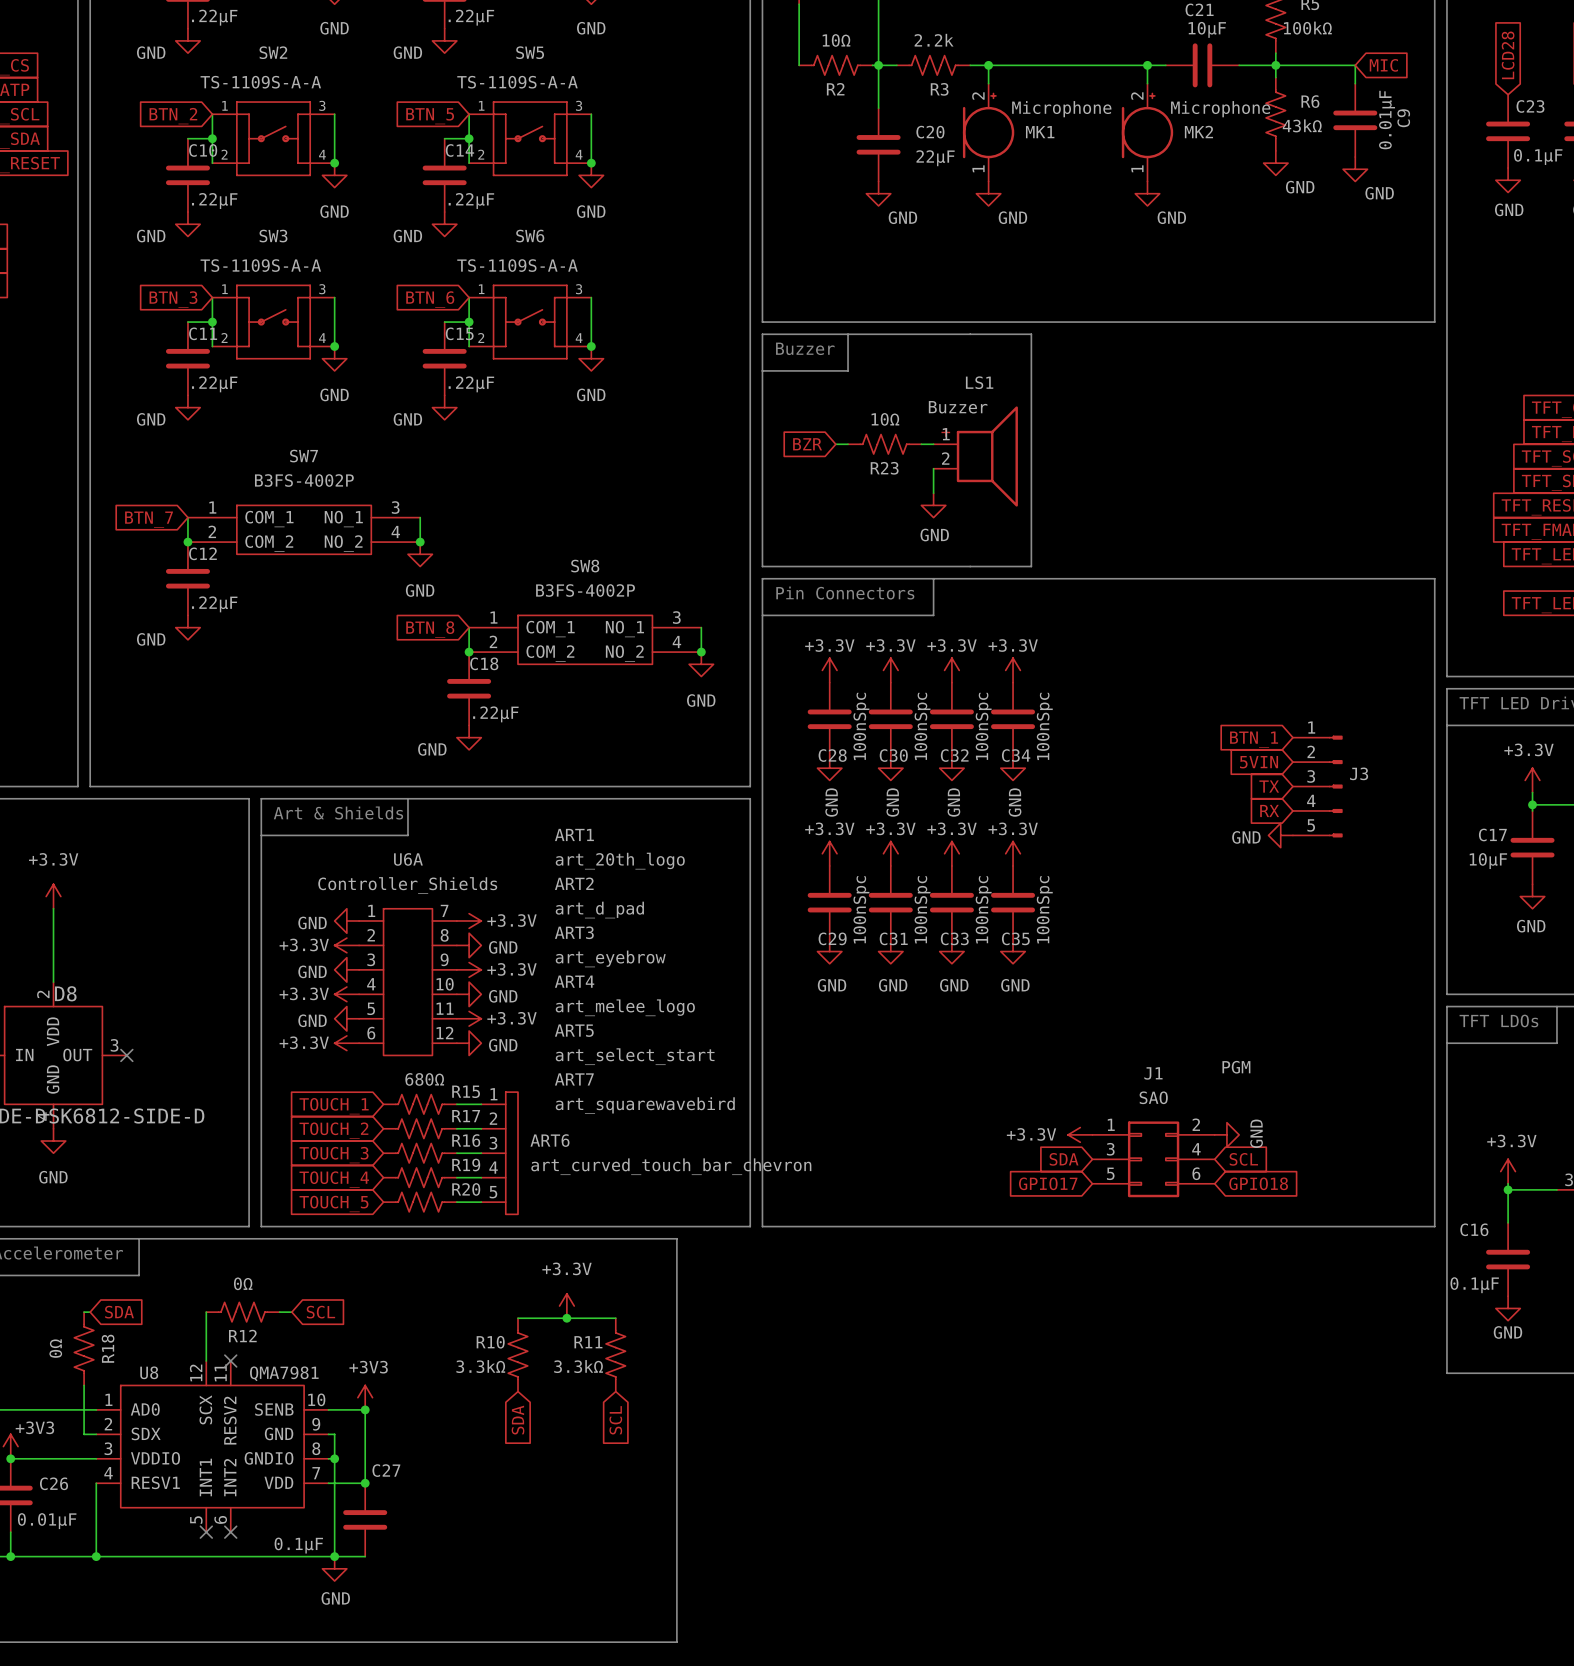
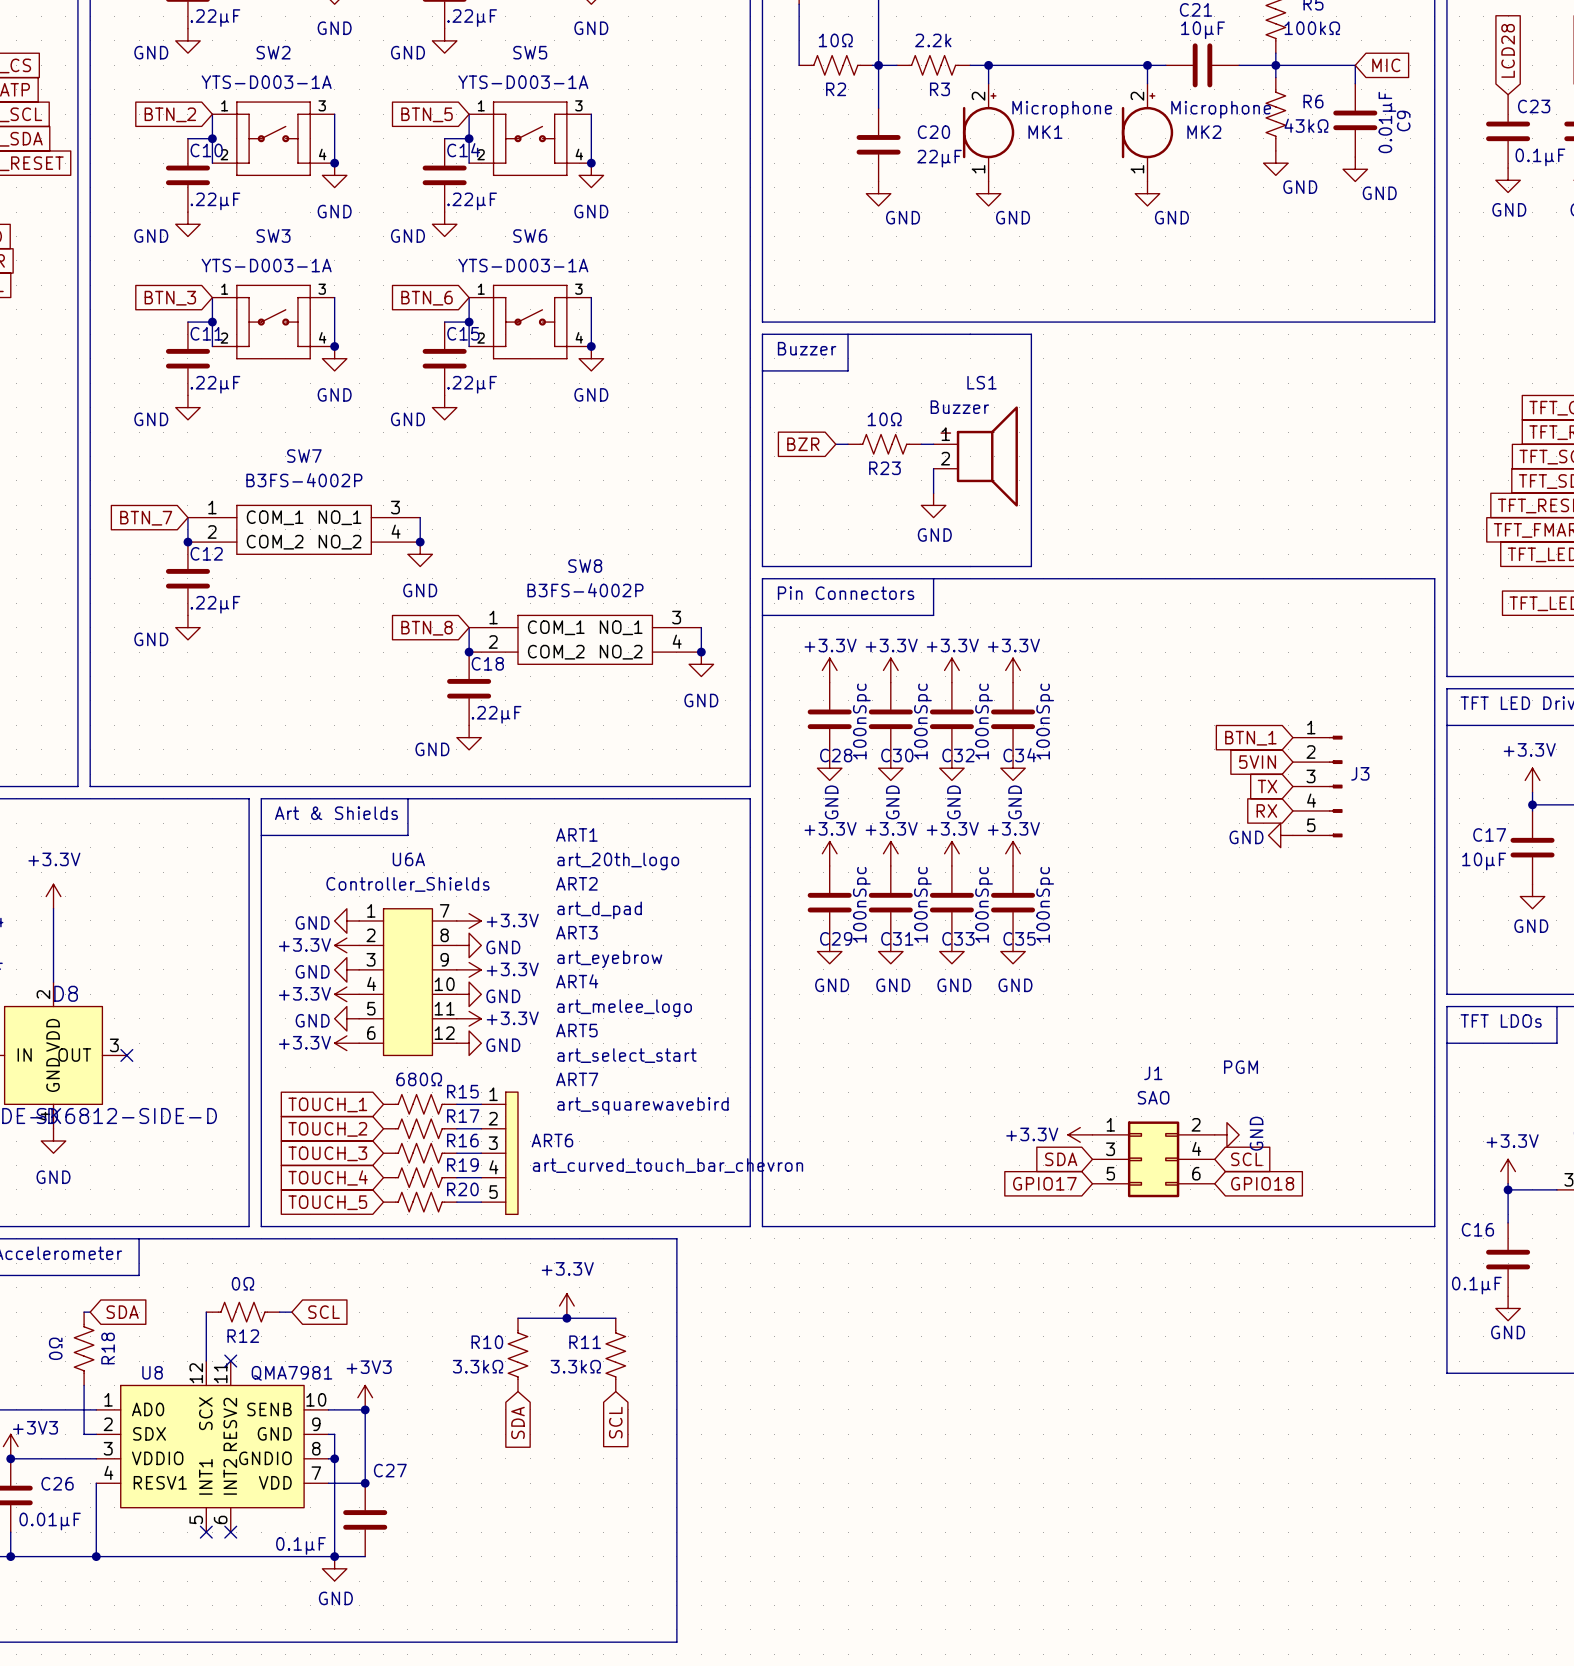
SW2 value: TS-1109S-A-A (260, 82) -> YTS-D003-1A (266, 82)
SW5 value: TS-1109S-A-A (517, 82) -> YTS-D003-1A (523, 82)
SW3 value: TS-1109S-A-A (260, 265) -> YTS-D003-1A (266, 265)
SW6 value: TS-1109S-A-A (517, 265) -> YTS-D003-1A (523, 265)

